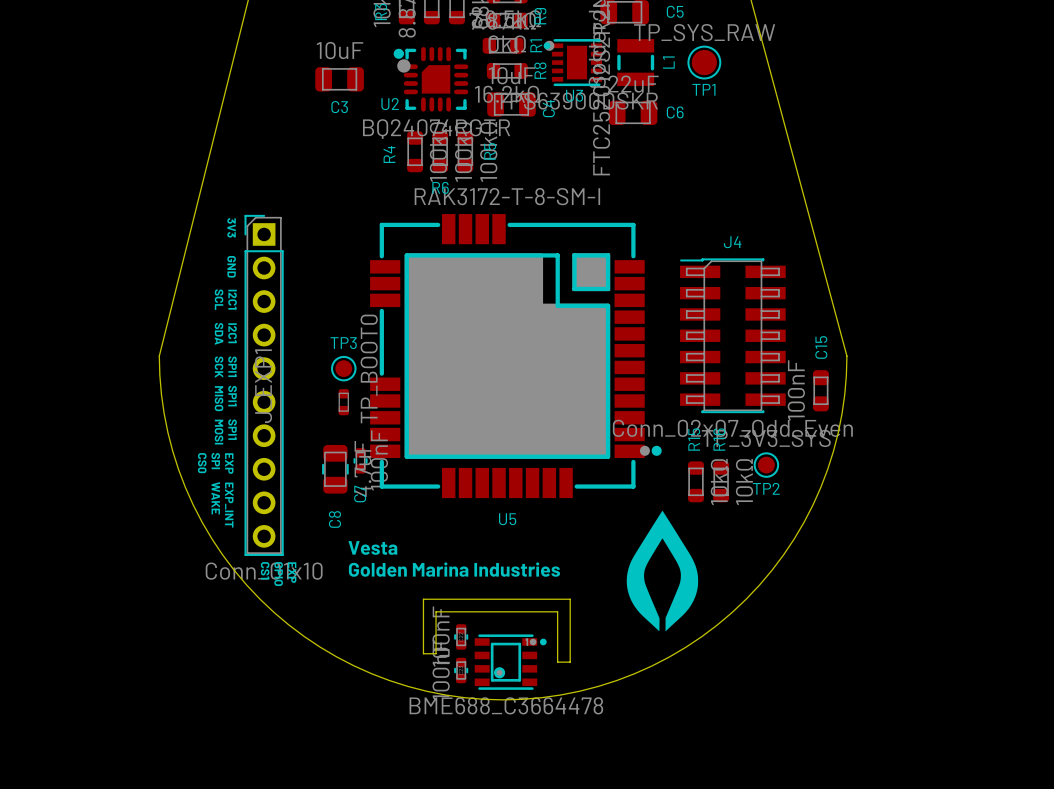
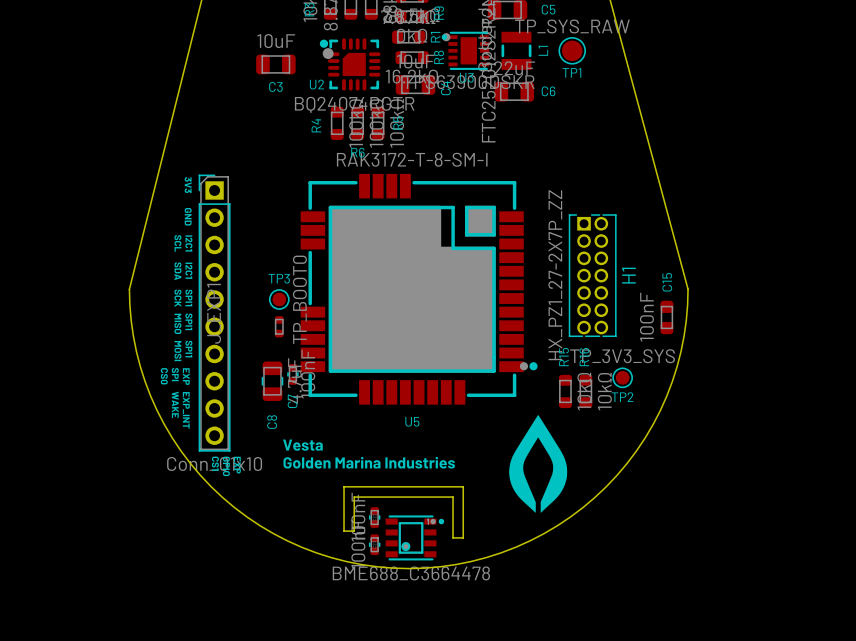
J4: Conn_02x07_Odd_Even (732, 335) -> none
H1: none -> HX_PZ1_27-2X7P_ZZ (592, 275)

